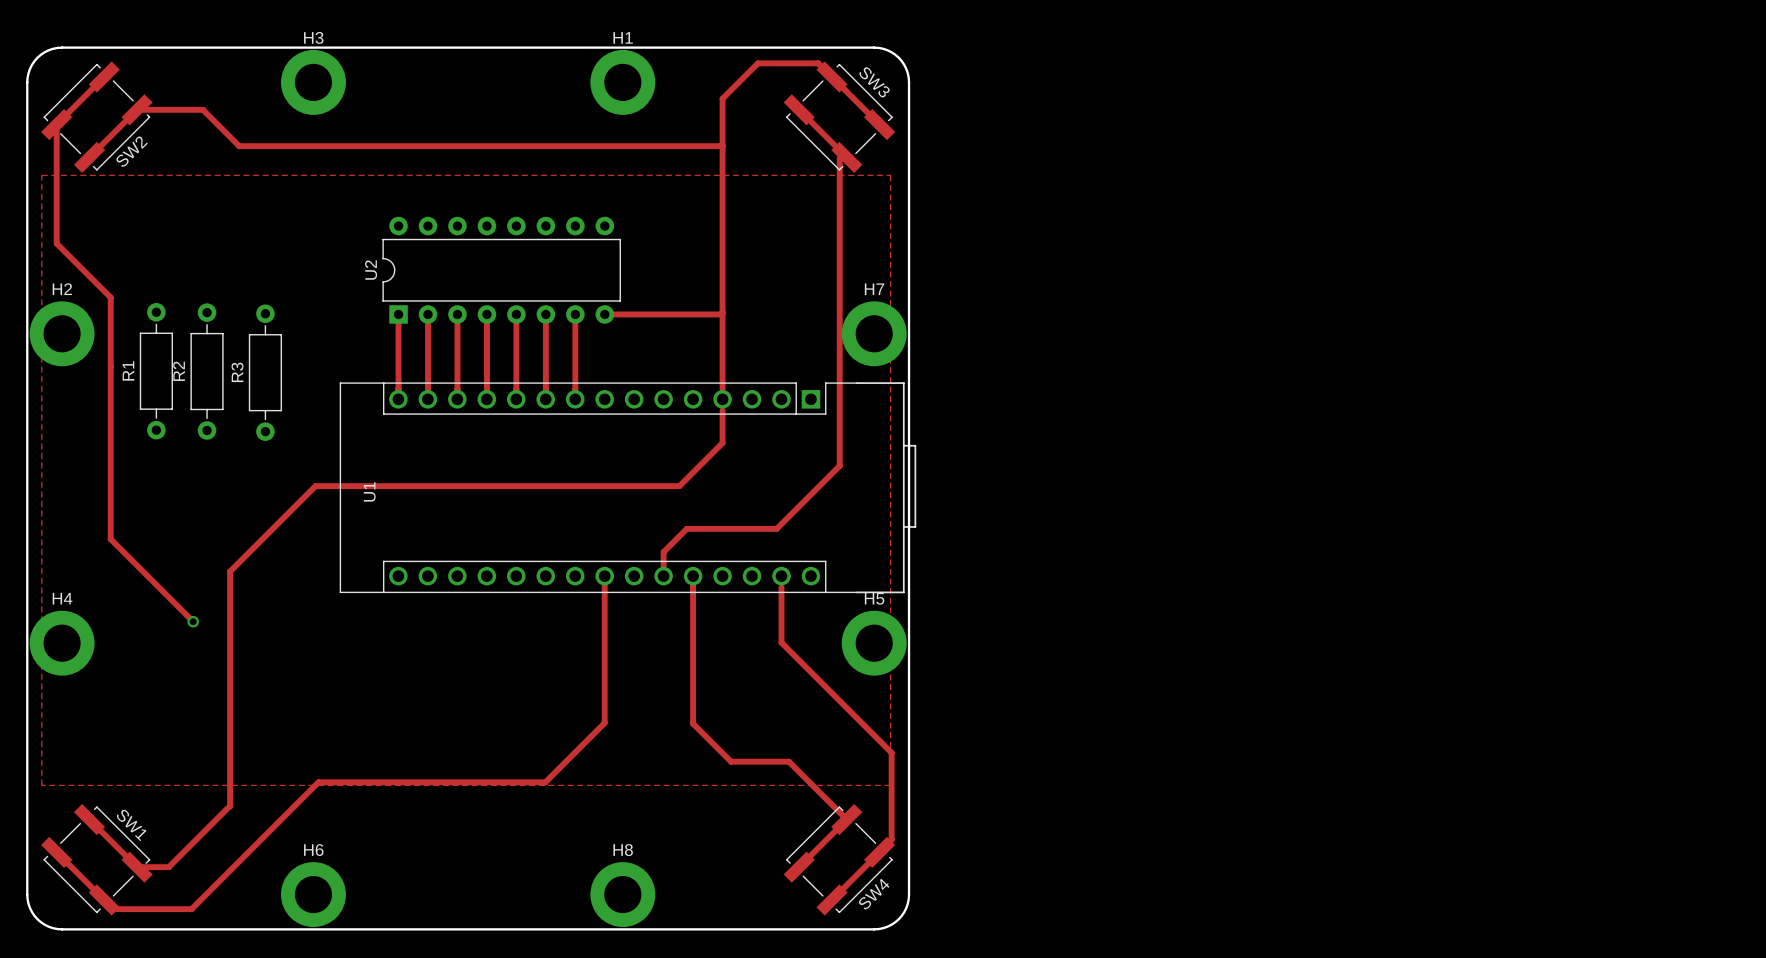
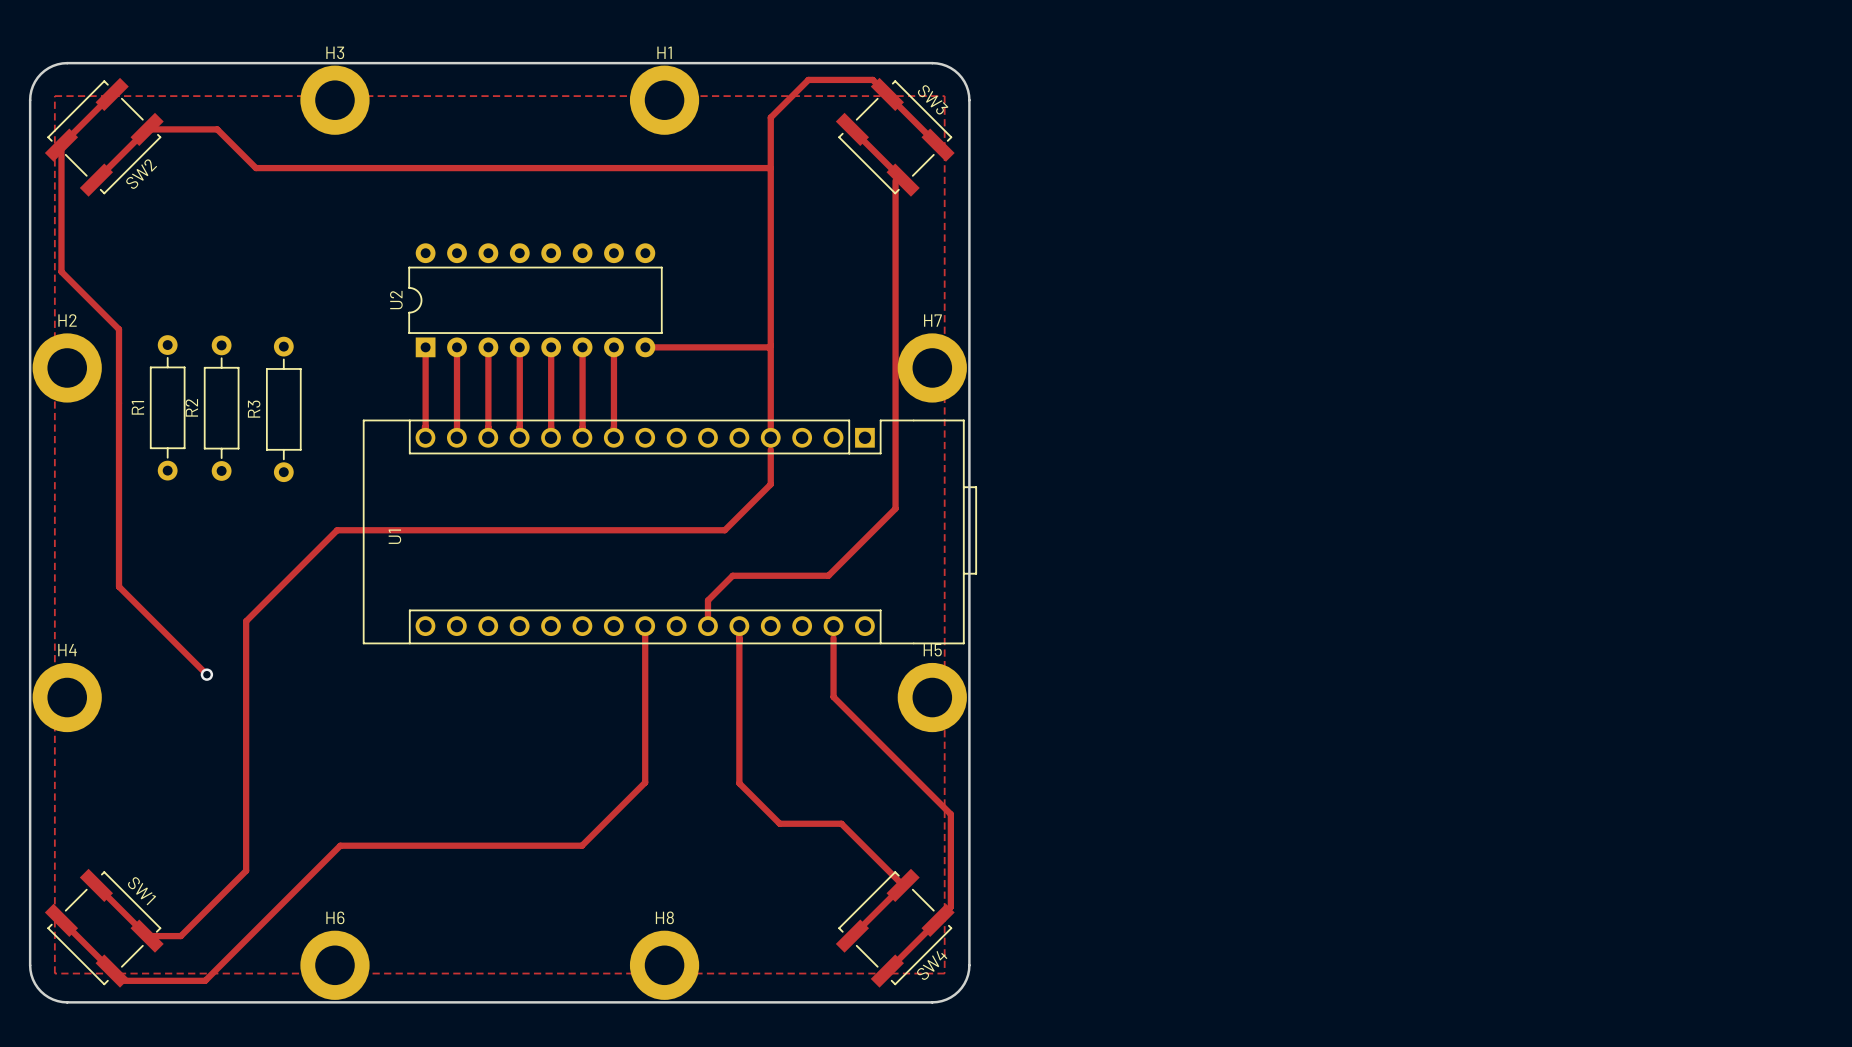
zone outline: (41, 175) (41, 785) (890, 785) (890, 175) (41, 175) -> (54, 96) (54, 973) (944, 973) (944, 96) (54, 96)

